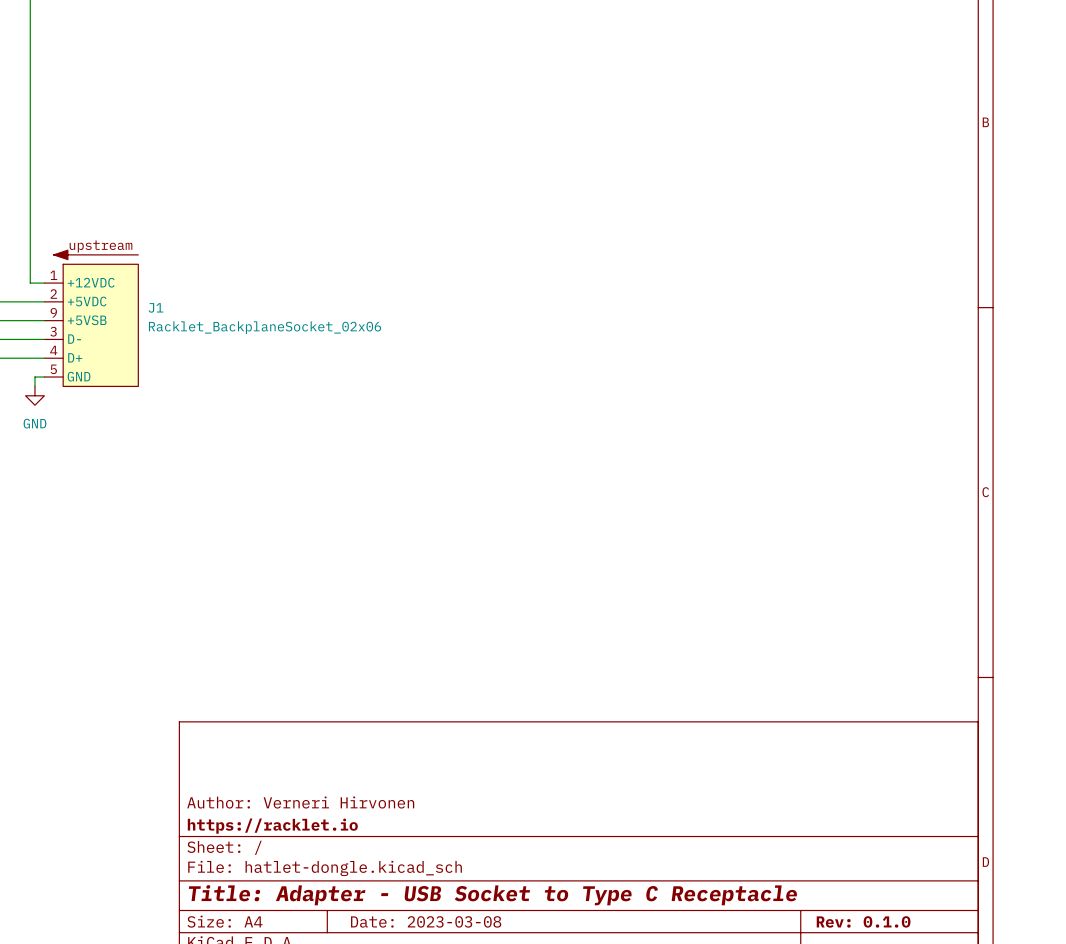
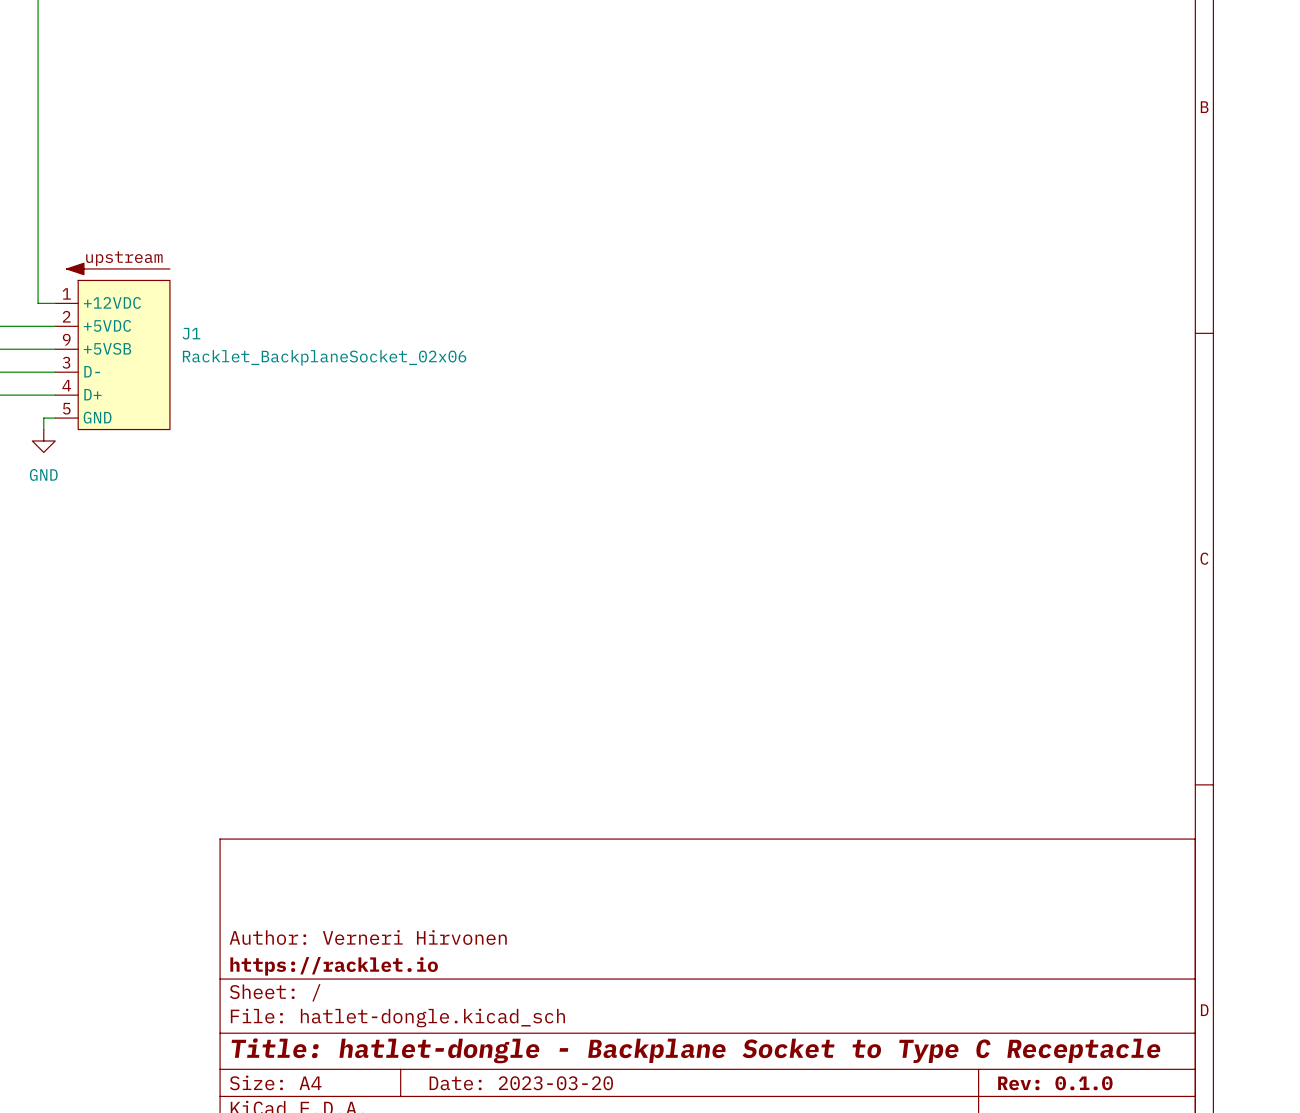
title block: Title: Adapter - USB Socket to Type C Receptacle (492, 895) -> Title: hatlet-dongle - Backplane Socket to Type C Receptacle (695, 1050)
title block: Date: 2023-03-08 (426, 921) -> Date: 2023-03-20 (521, 1083)

